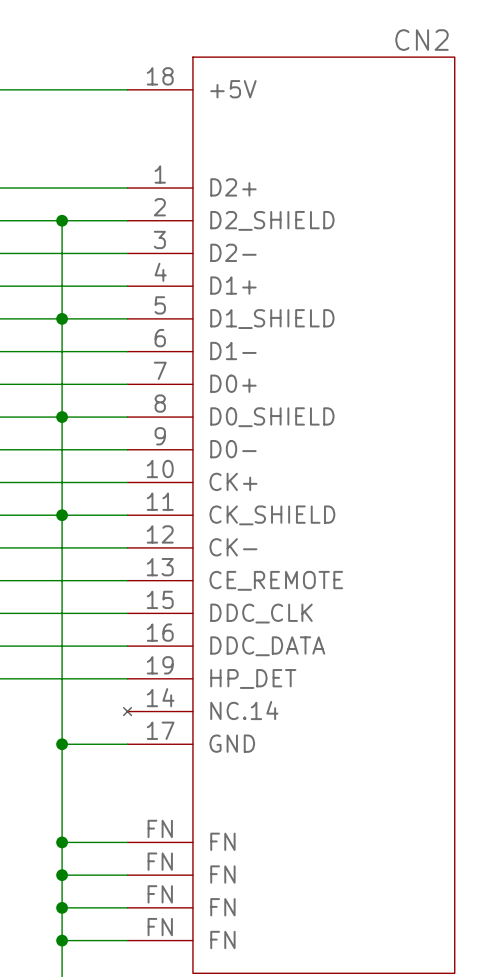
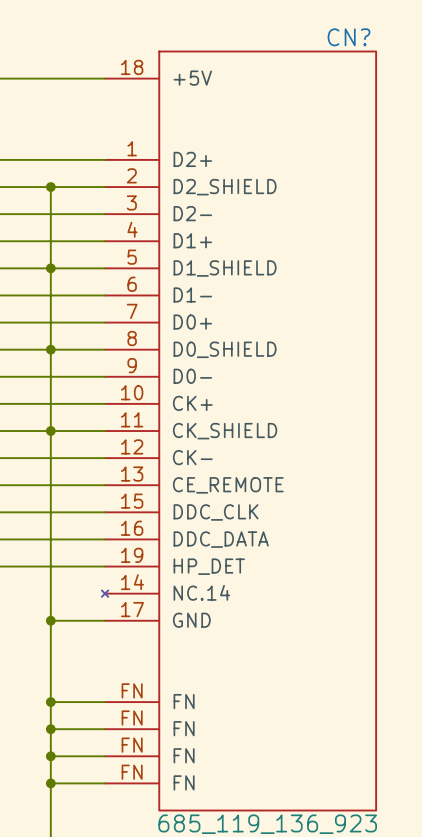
CN2 name: CN2 (422, 40) -> CN? (349, 37)

